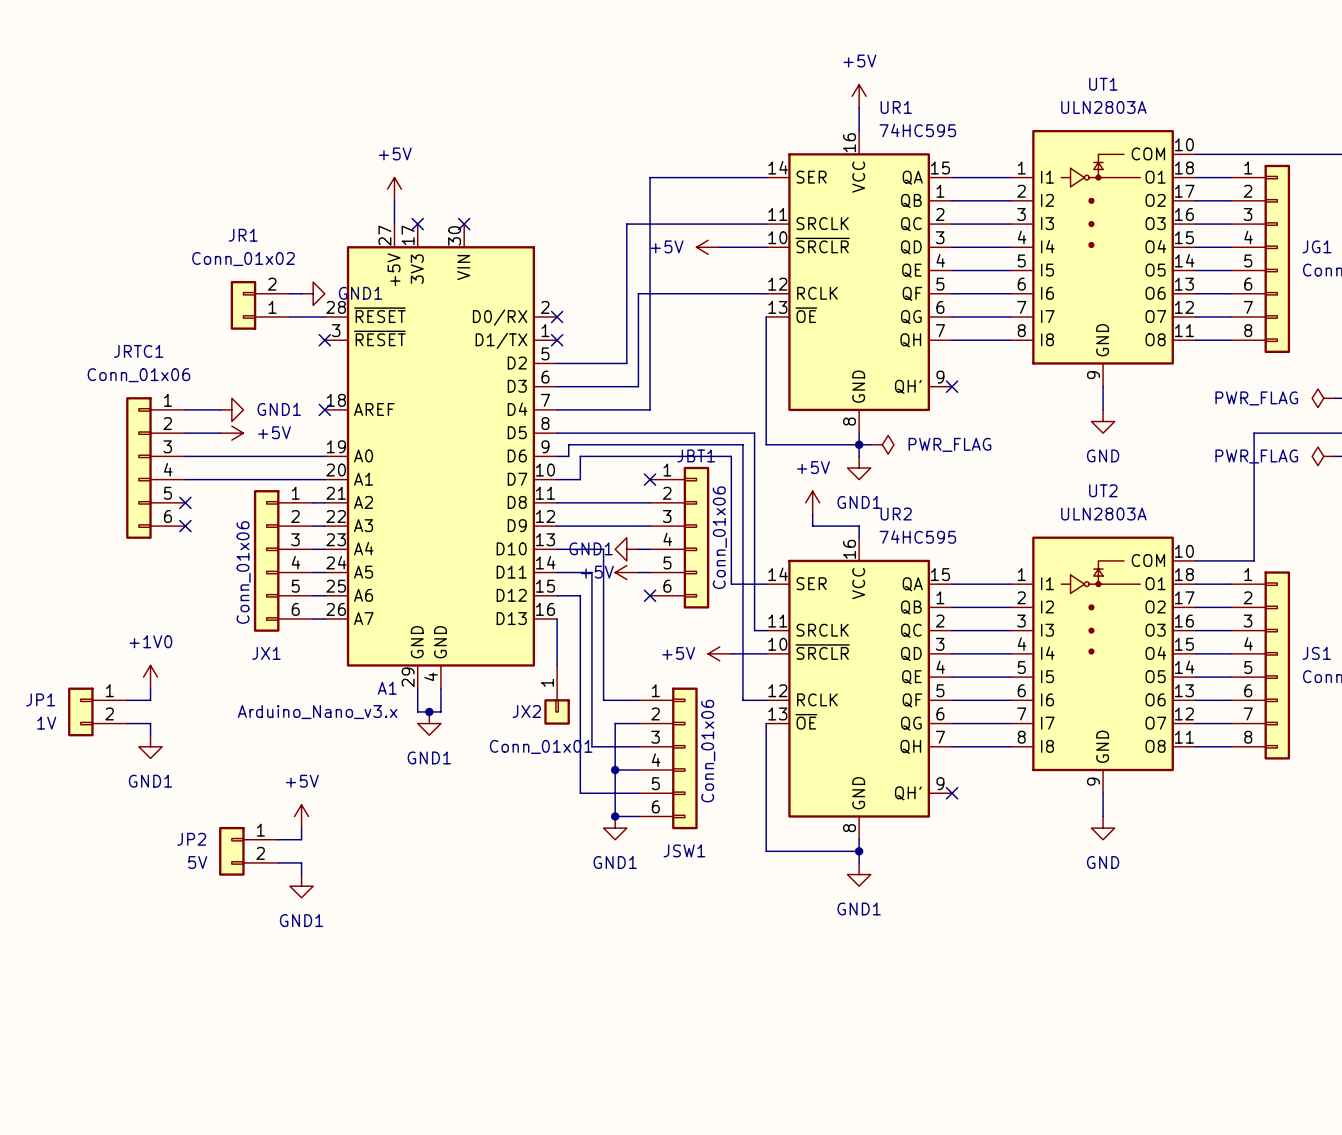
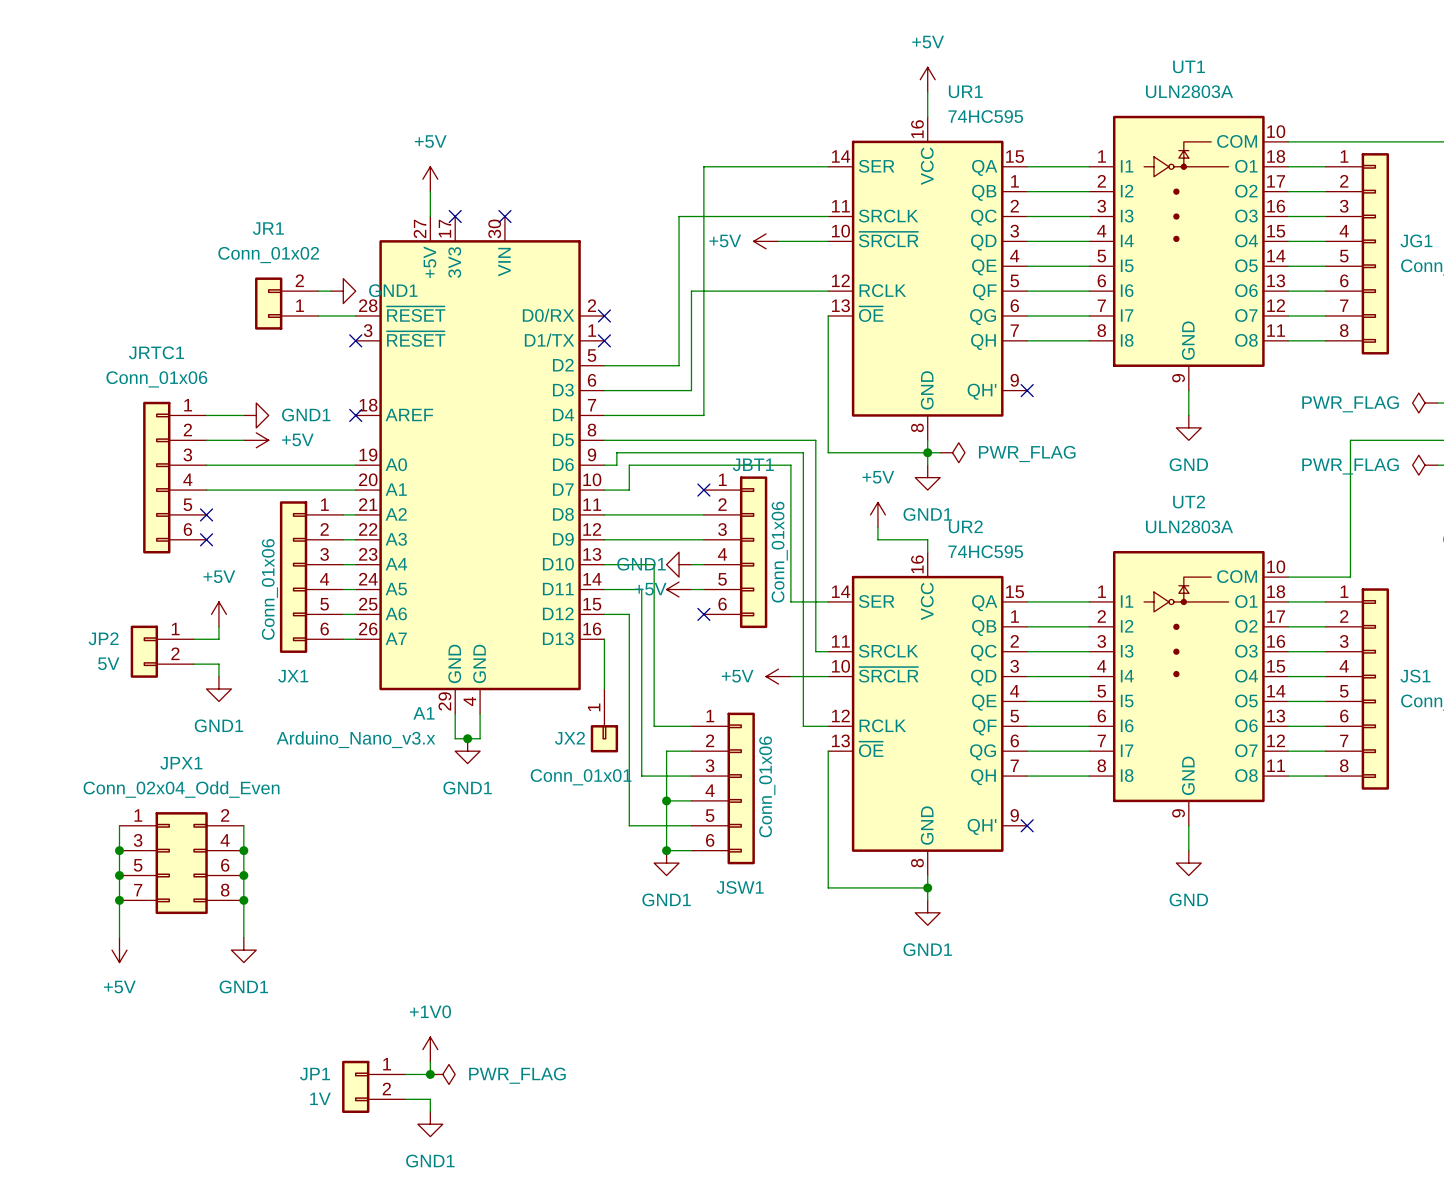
power symbol: none -> +5V (218, 614)
power symbol: none -> GND1 (218, 689)
power symbol: +1V0 (150, 677) -> none
wire: (150, 688) (150, 700) (127, 700) -> (218, 626) (218, 639) (194, 639)
JP1 position: (97, 711) -> (373, 1086)
wire: (127, 723) (150, 723) (150, 735) -> (194, 664) (218, 664) (218, 676)
power symbol: GND1 (150, 746) -> none
wire: none -> (119, 825) (119, 937)
wire: none -> (243, 825) (243, 937)
junction: none -> (119, 850)
junction: none -> (243, 850)
power symbol: +5V (301, 816) -> none
JPX1: none -> Conn_02x04_Odd_Even (181, 863)
wire: (301, 828) (301, 839) (278, 839) -> (430, 1062) (430, 1074) (405, 1074)
junction: none -> (119, 875)
junction: none -> (243, 875)
JP2 position: (248, 851) -> (162, 651)
junction: none -> (119, 900)
junction: none -> (243, 900)
wire: (278, 862) (301, 862) (301, 874) -> (405, 1099) (430, 1099) (430, 1111)
power symbol position: GND1 (301, 886) -> GND1 (243, 950)
power symbol: none -> +5V (119, 950)
power symbol: none -> +1V0 (430, 1049)
junction: none -> (430, 1074)
power symbol: none -> PWR_FLAG (442, 1074)
power symbol: none -> GND1 (430, 1124)

